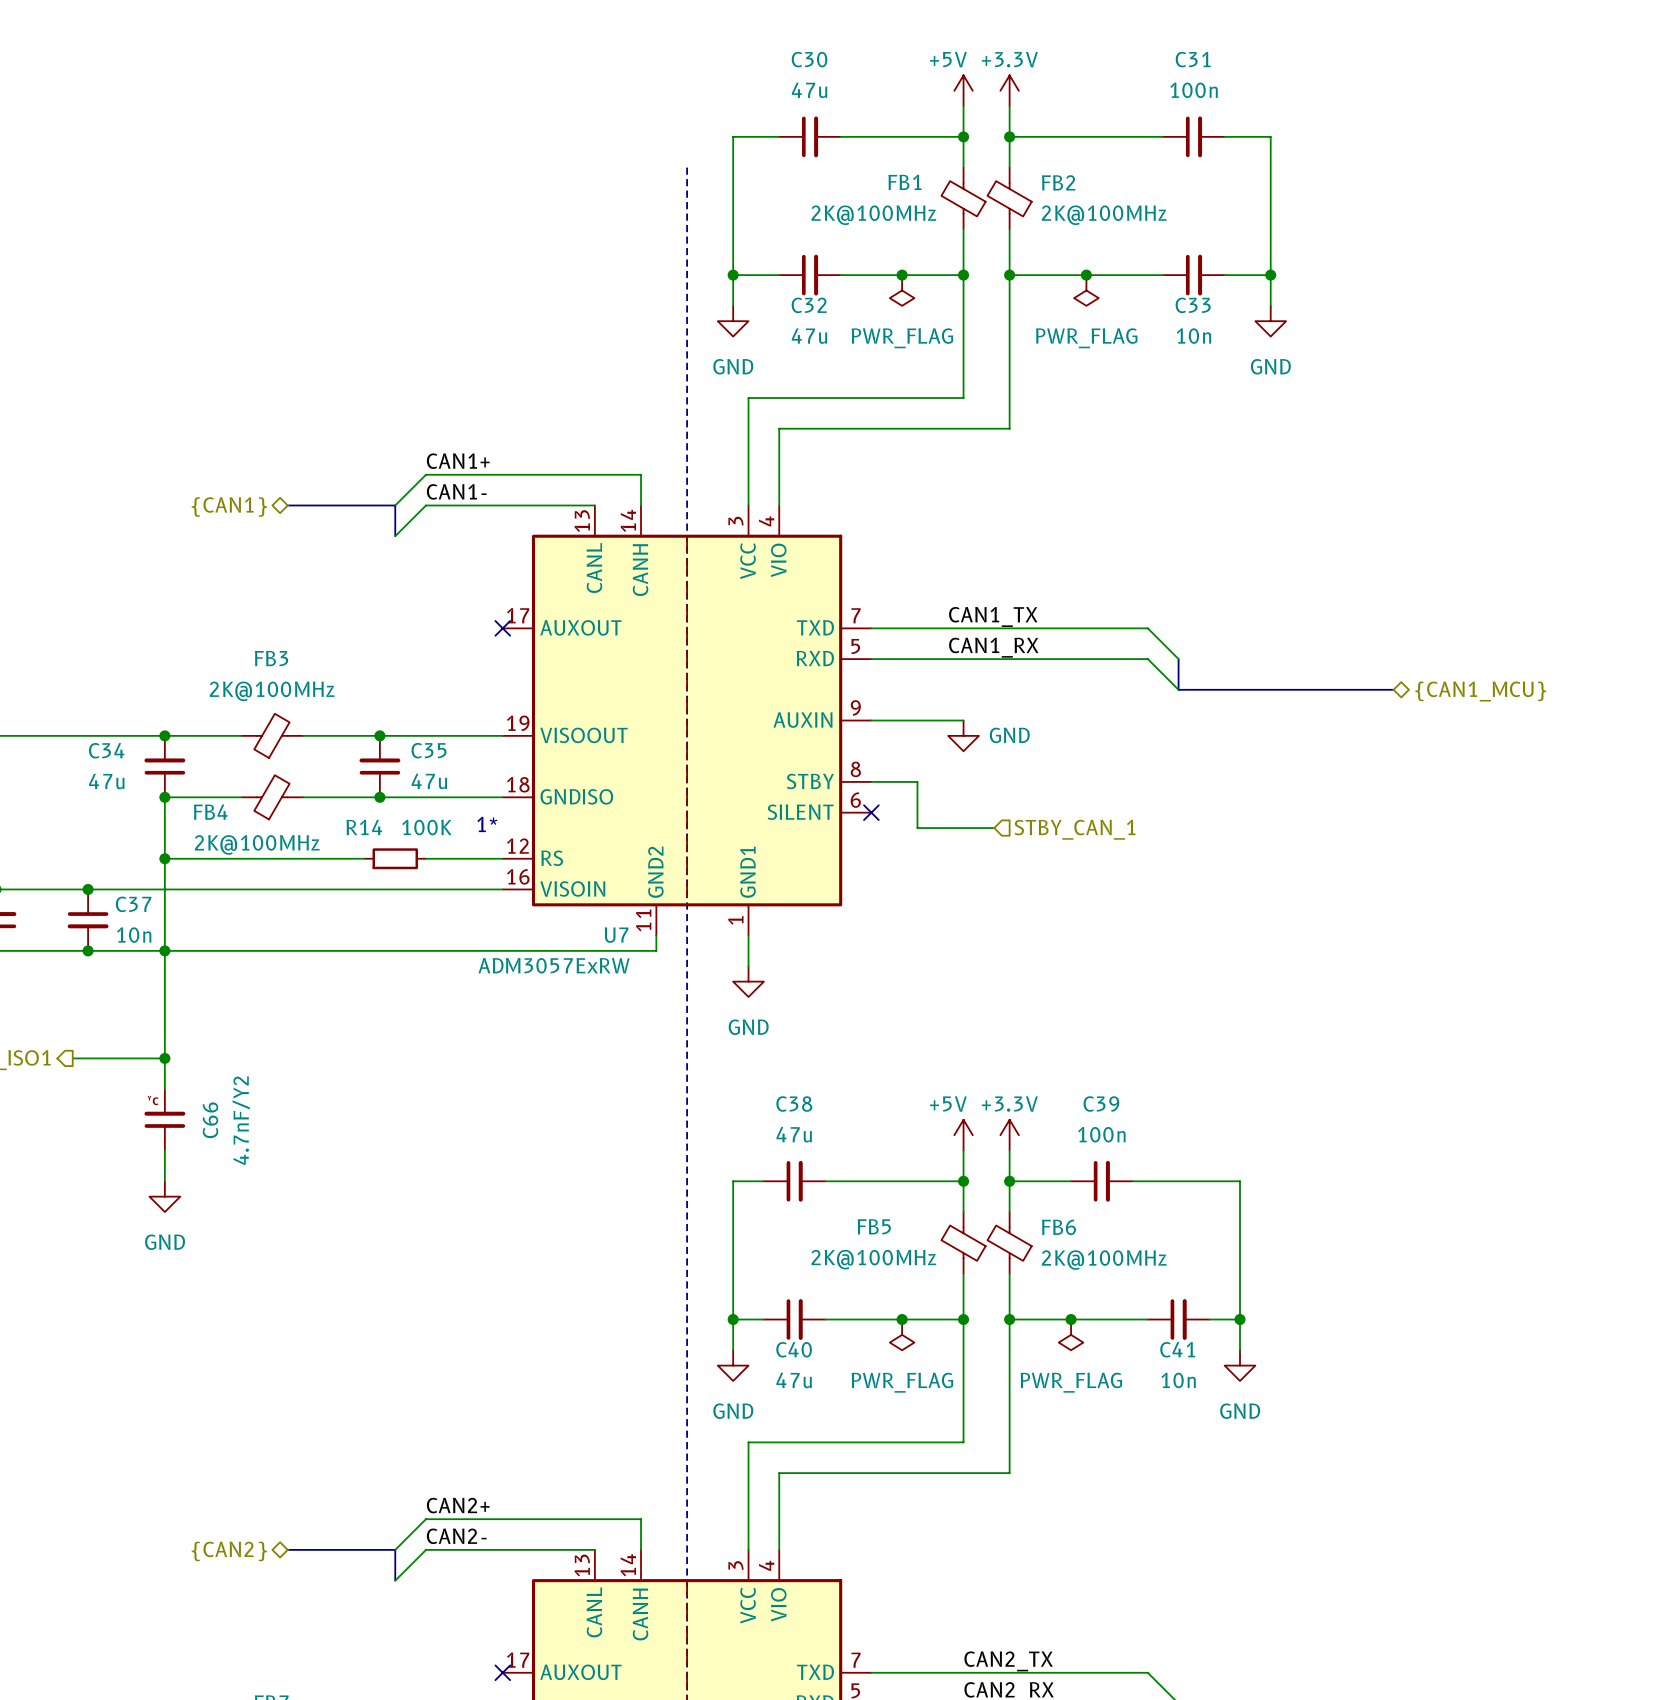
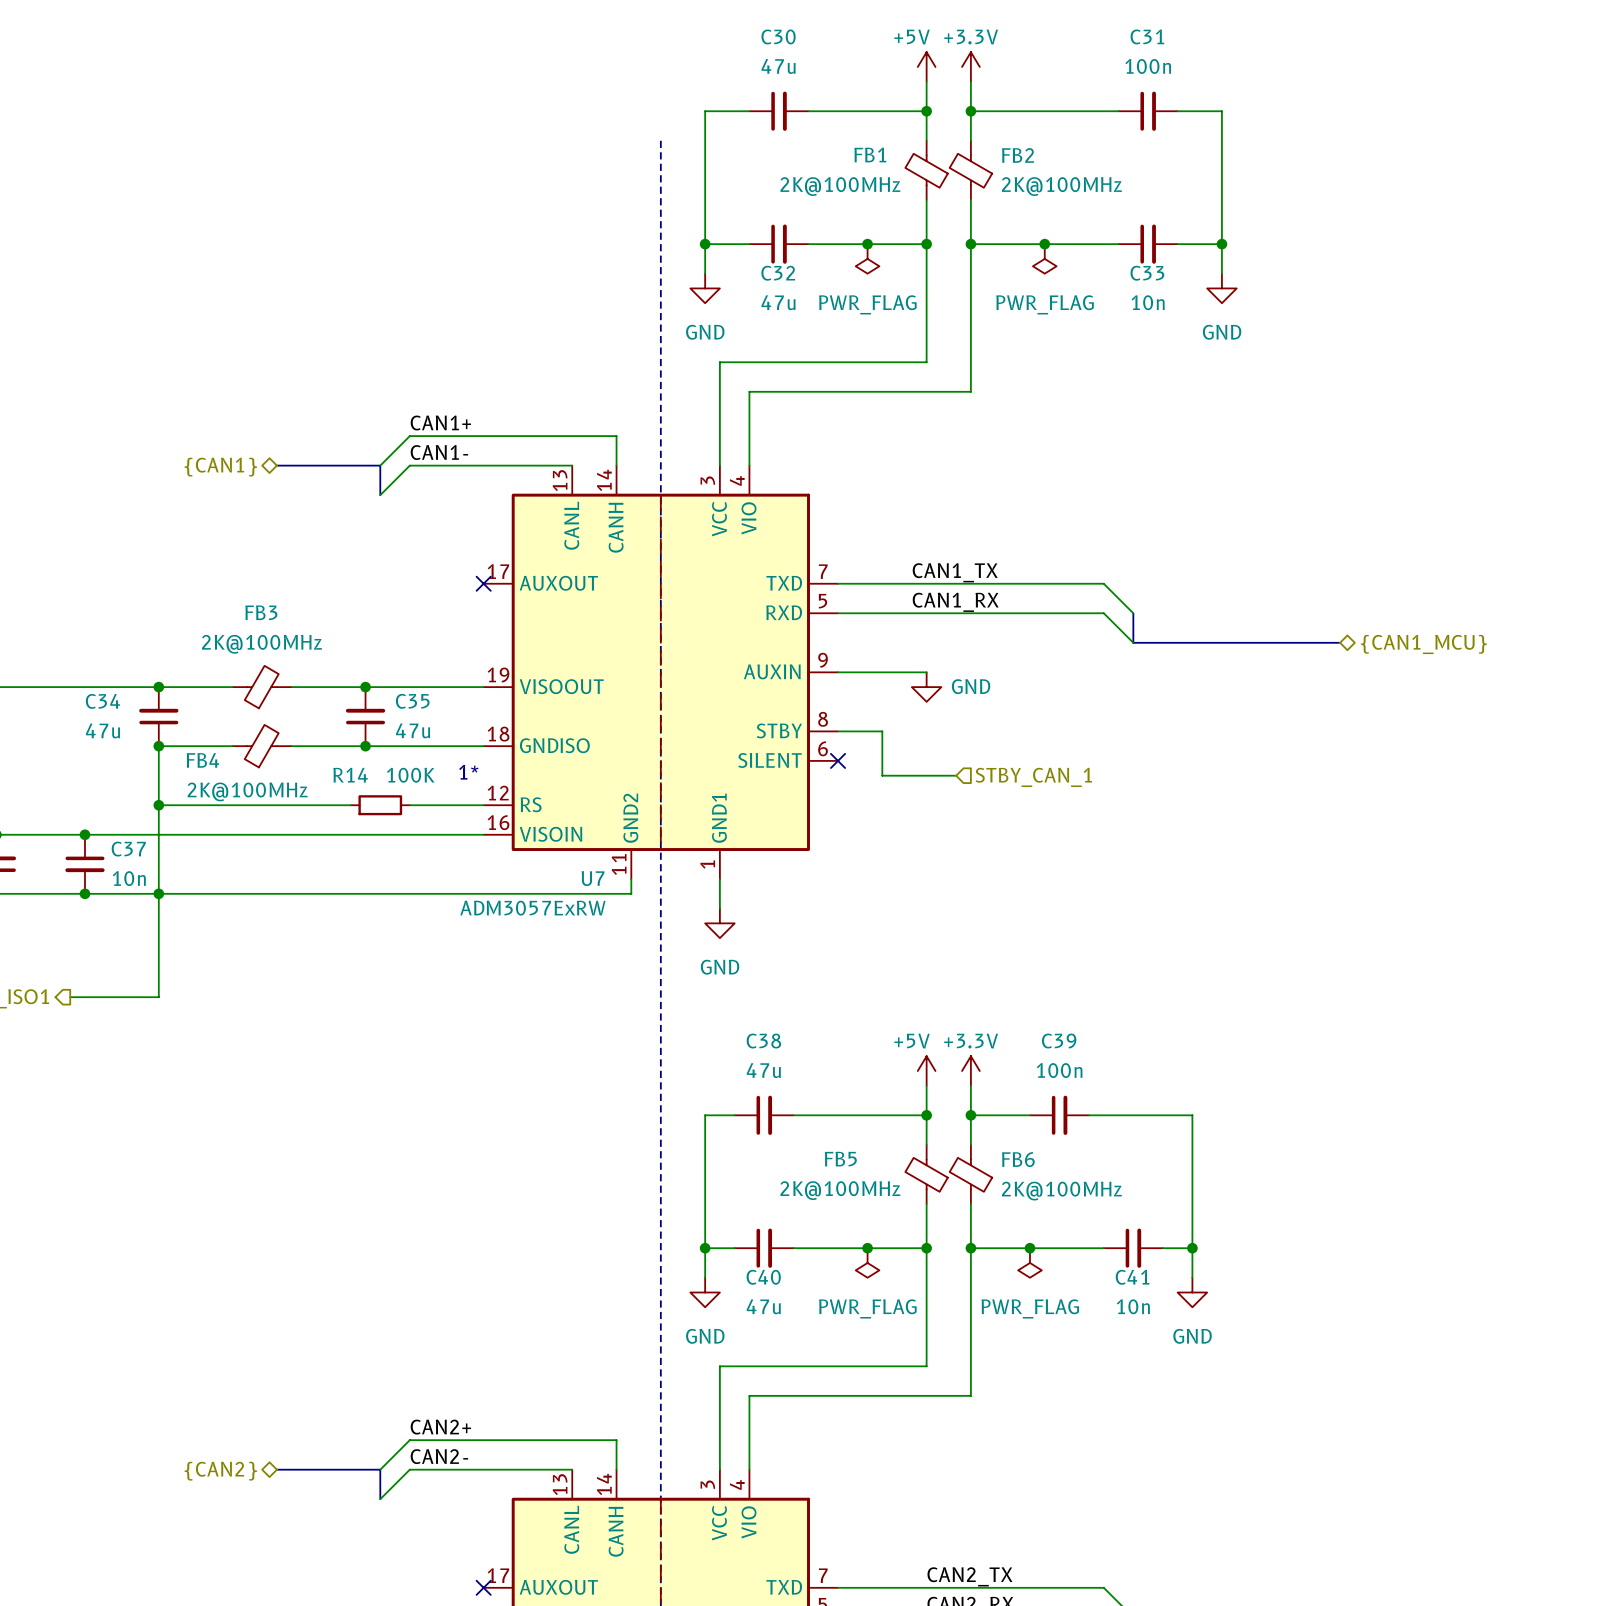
wire: (164, 1058) (164, 1089) -> none
junction: (164, 1058) -> none
C66: 4.7nF/Y2 (164, 1119) -> none
wire: (164, 1150) (164, 1181) -> none
power symbol: GND (164, 1196) -> none

